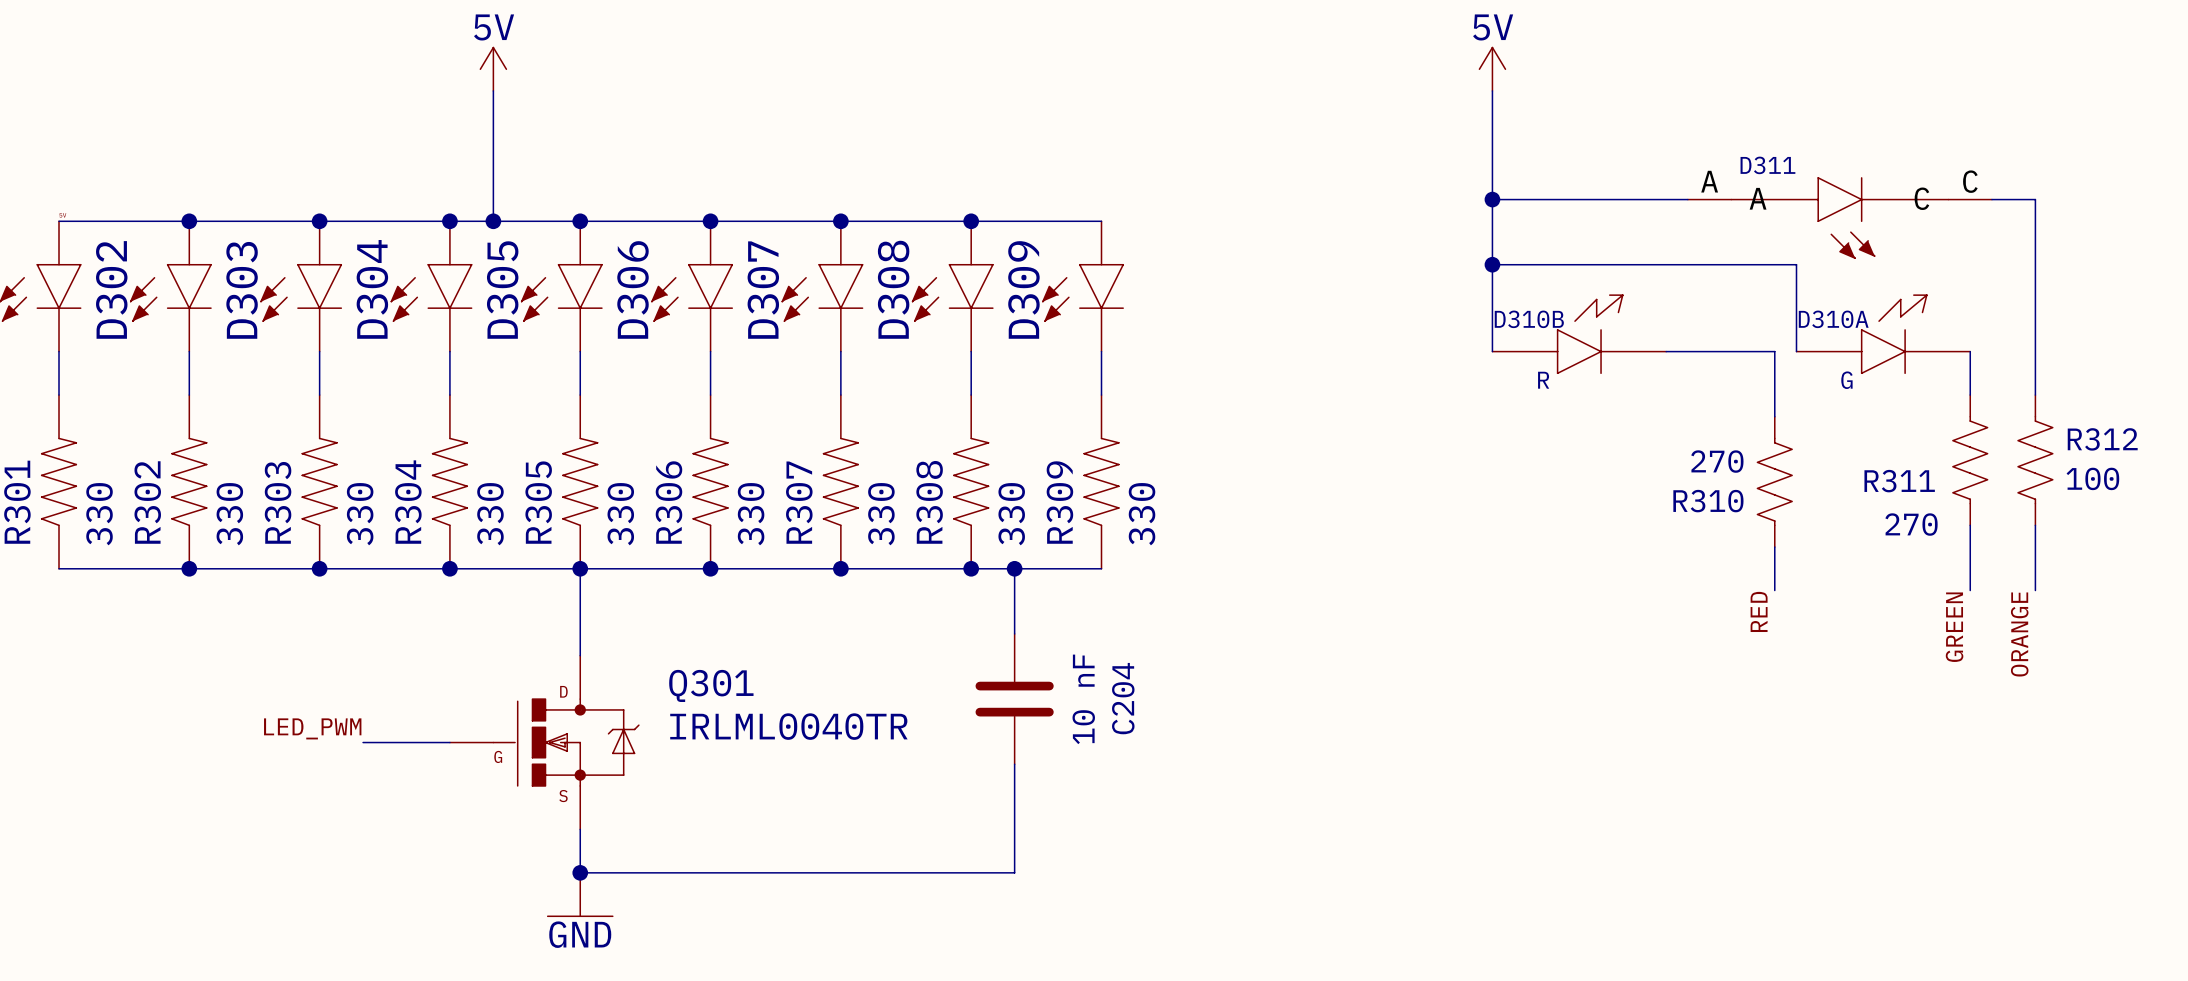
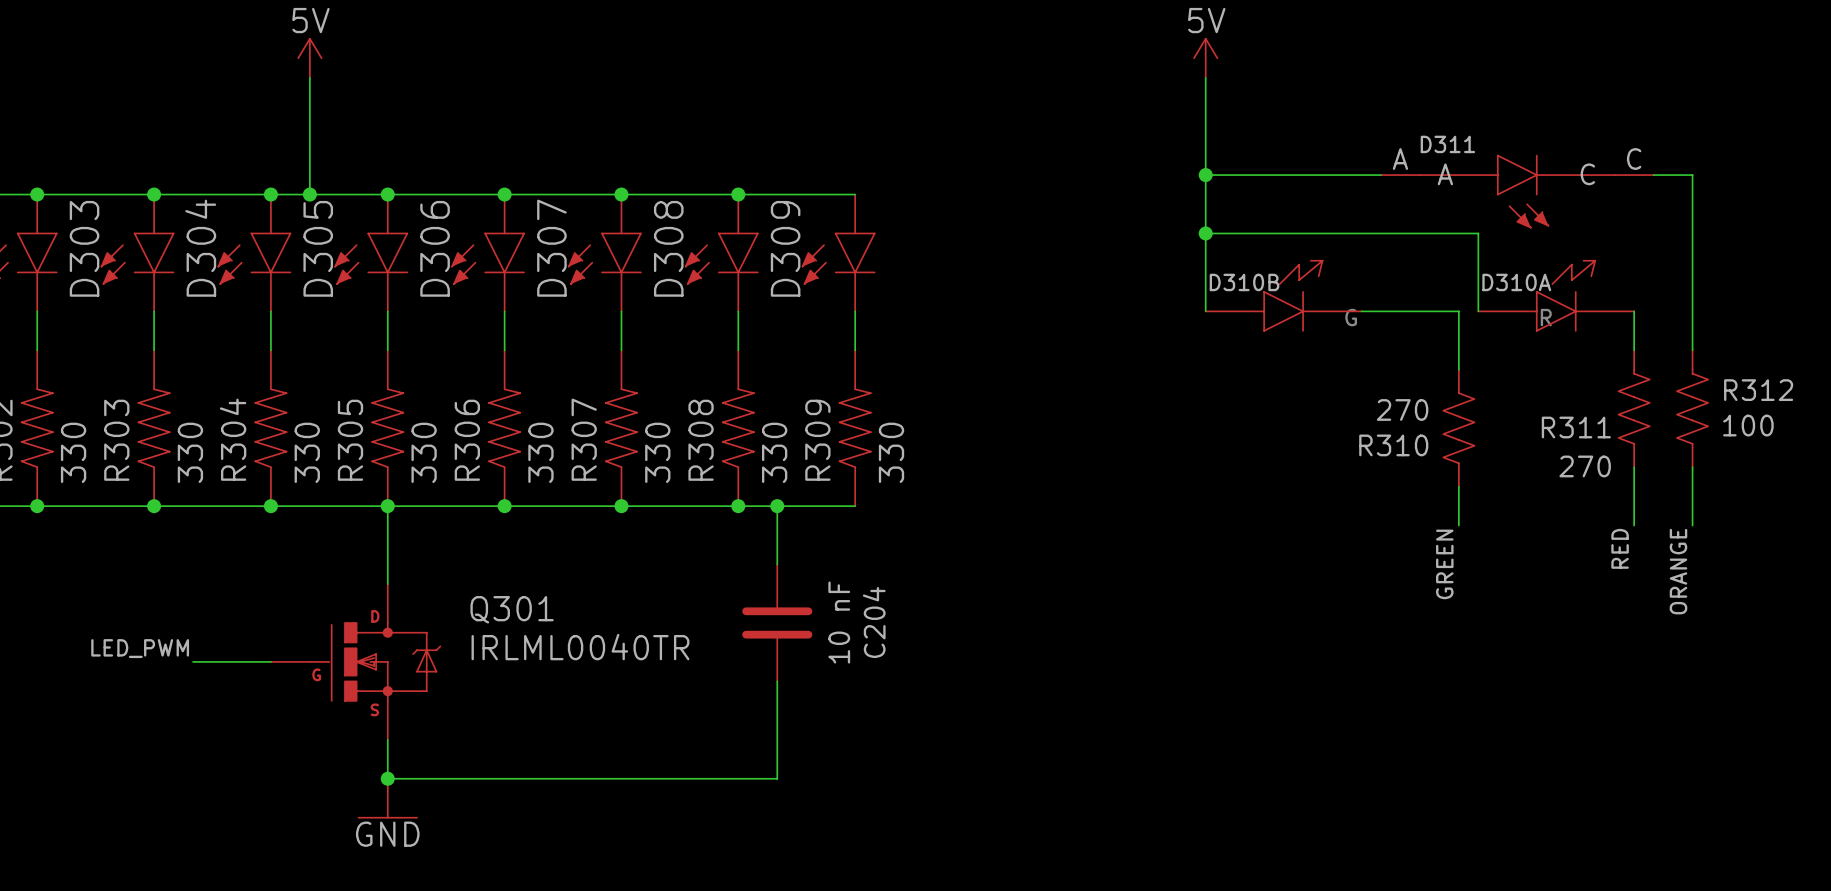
text position: R (1543, 380) -> R (1546, 317)
text position: G (1846, 380) -> G (1351, 317)
label: RED (1759, 611) -> GREEN (1444, 564)
label: GREEN (1954, 627) -> RED (1620, 548)

